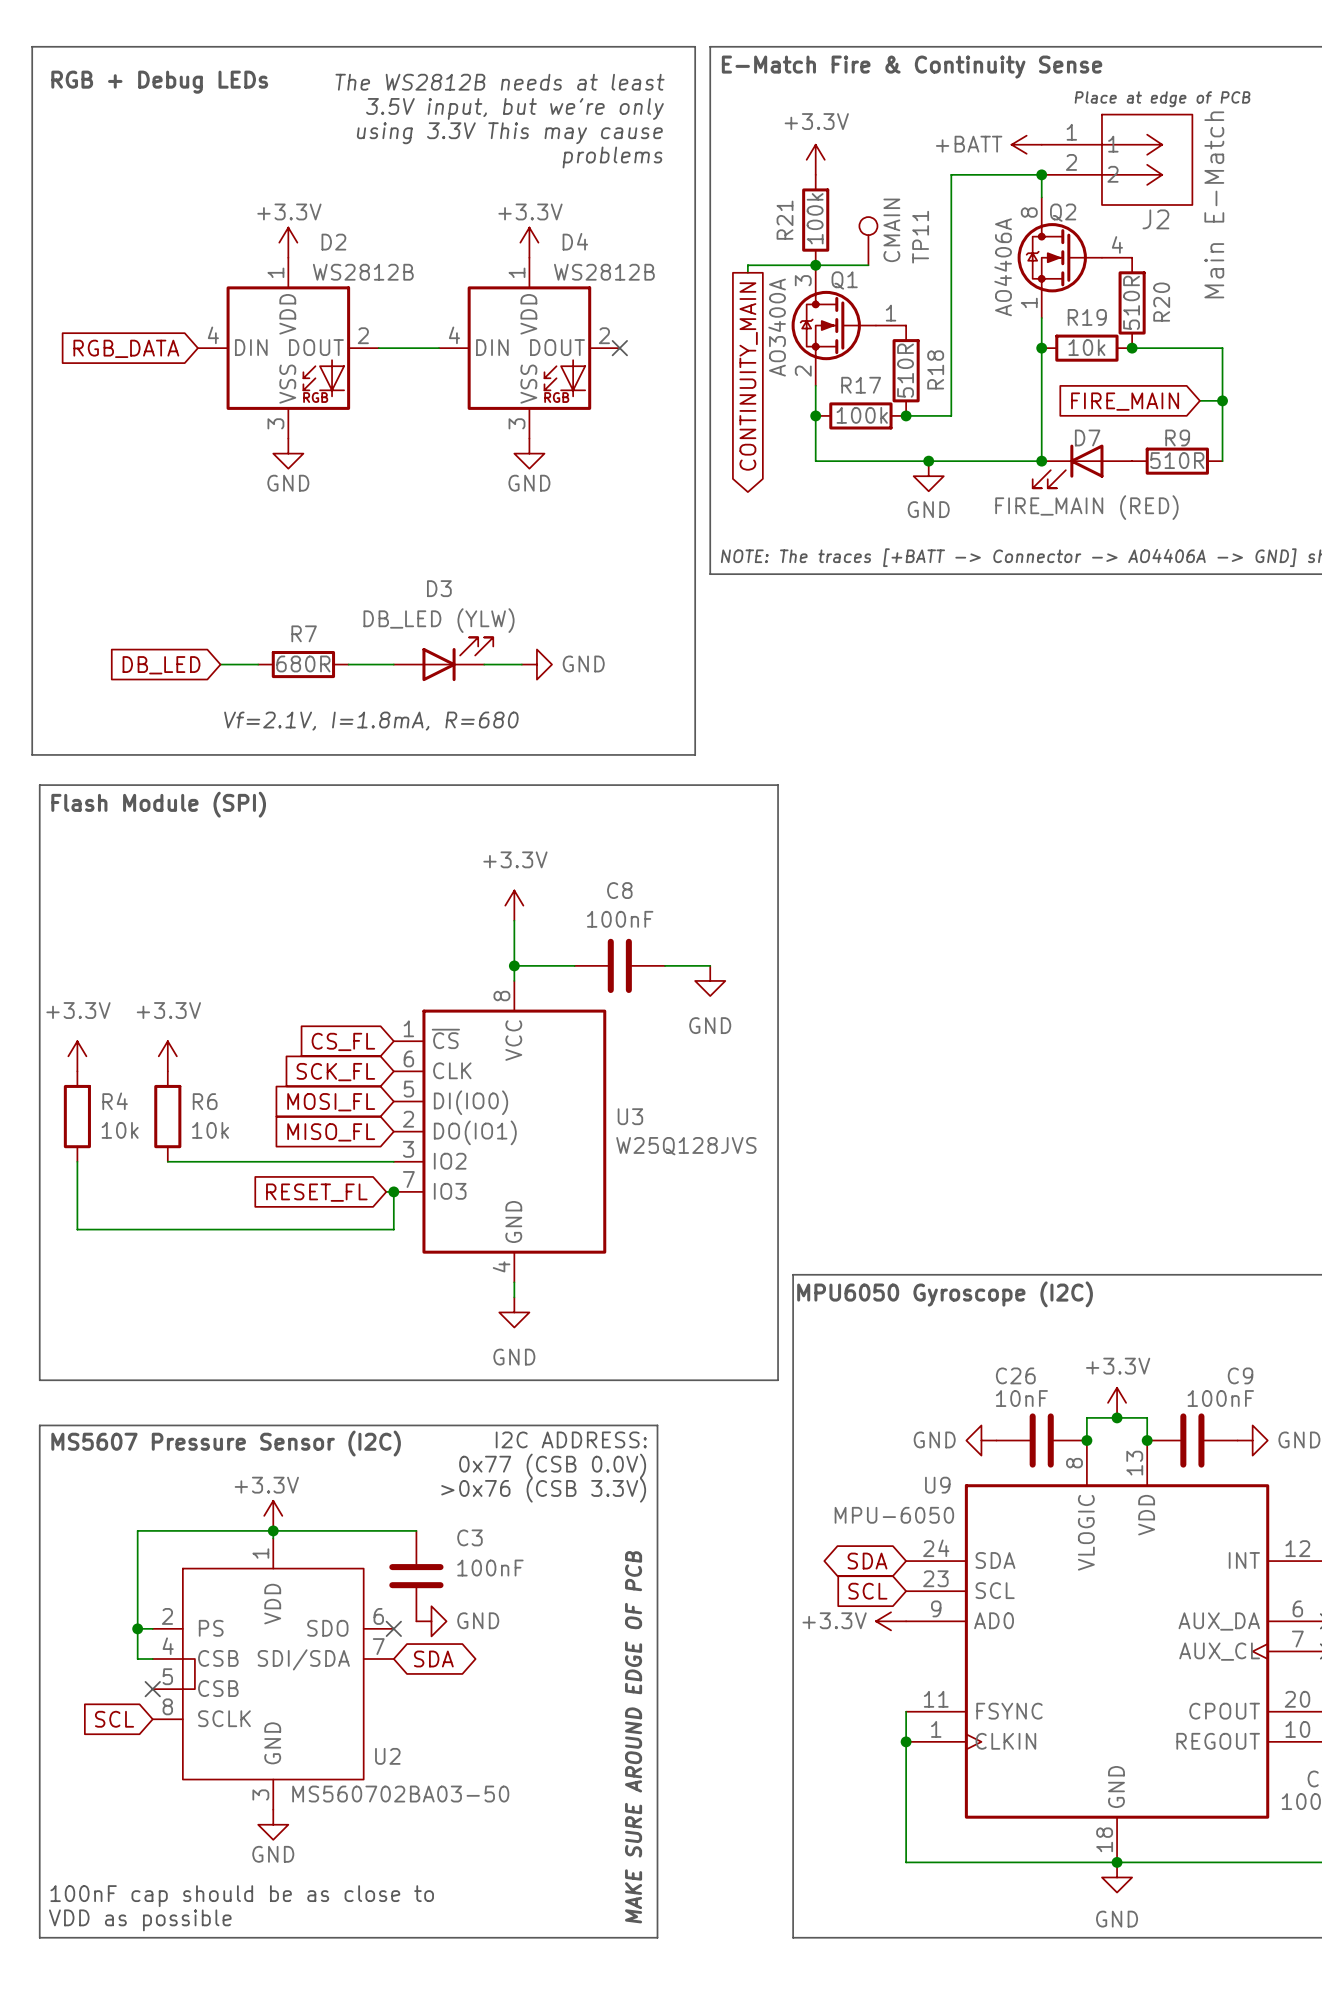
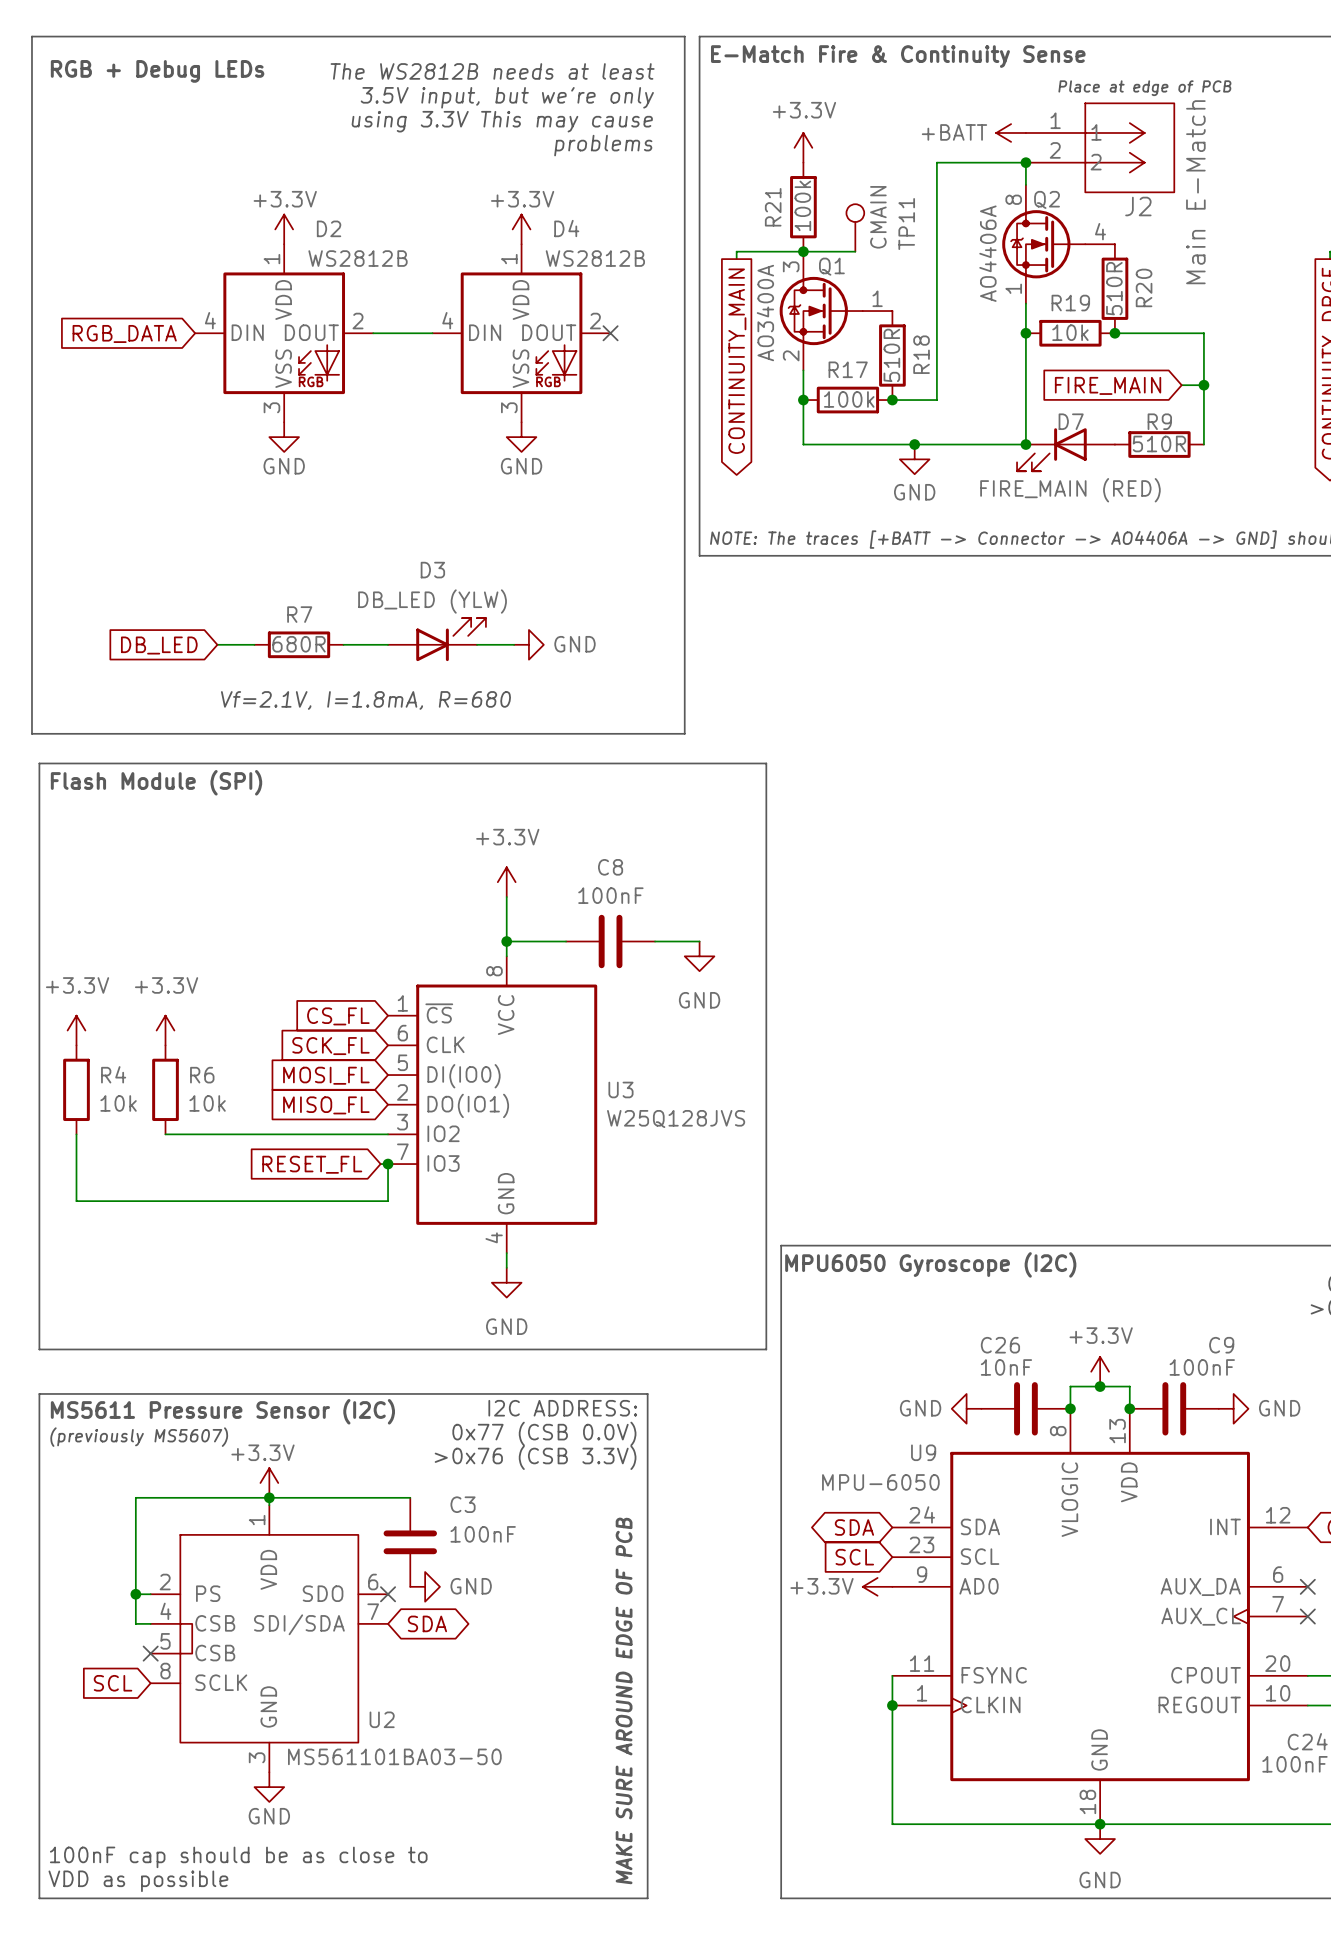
text: MS5607 Pressure Sensor (I2C) (226, 1443) -> MS5611 Pressure Sensor (I2C) (222, 1411)
text: none -> (previously MS5607) (139, 1437)
U2 value: MS560702BA03-50 (400, 1794) -> MS561101BA03-50 (394, 1756)

